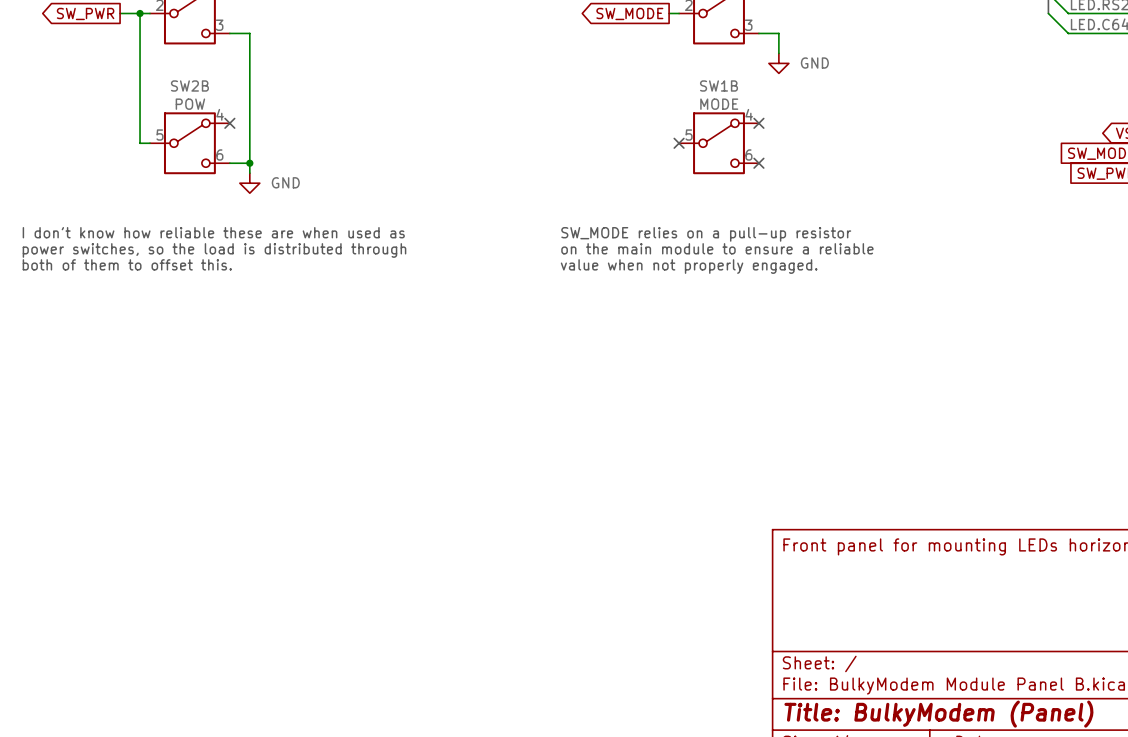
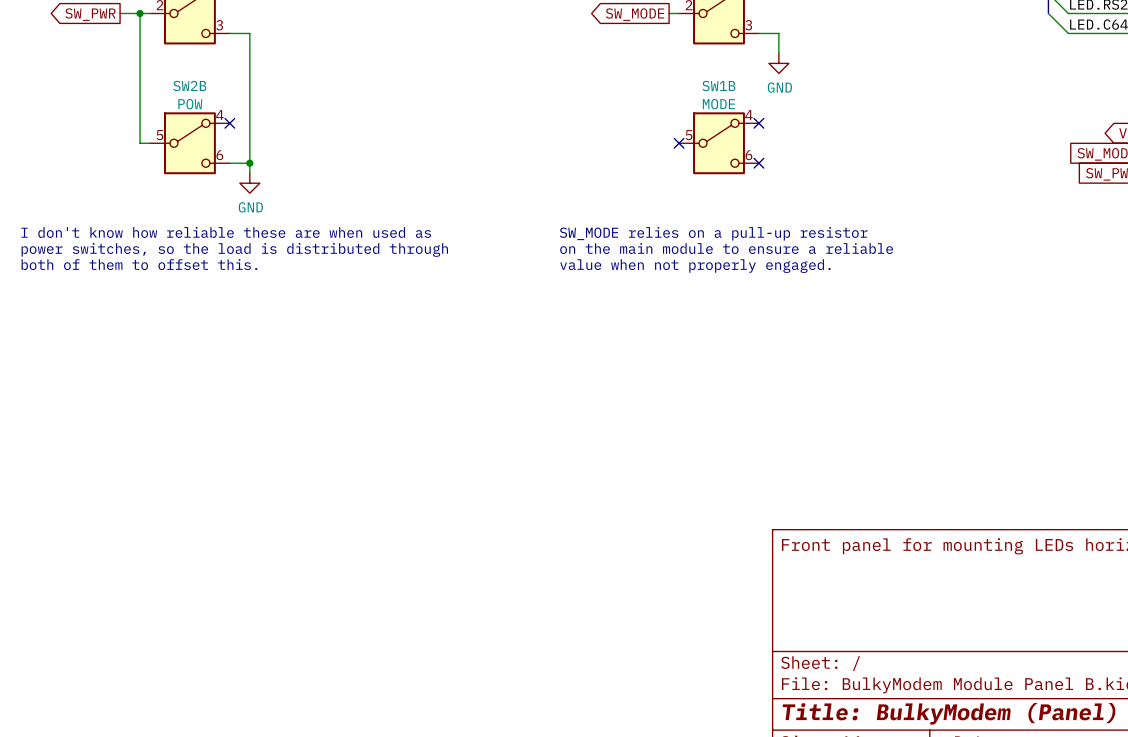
power symbol text position: GND (814, 63) -> GND (779, 87)
power symbol text position: GND (285, 182) -> GND (250, 207)

